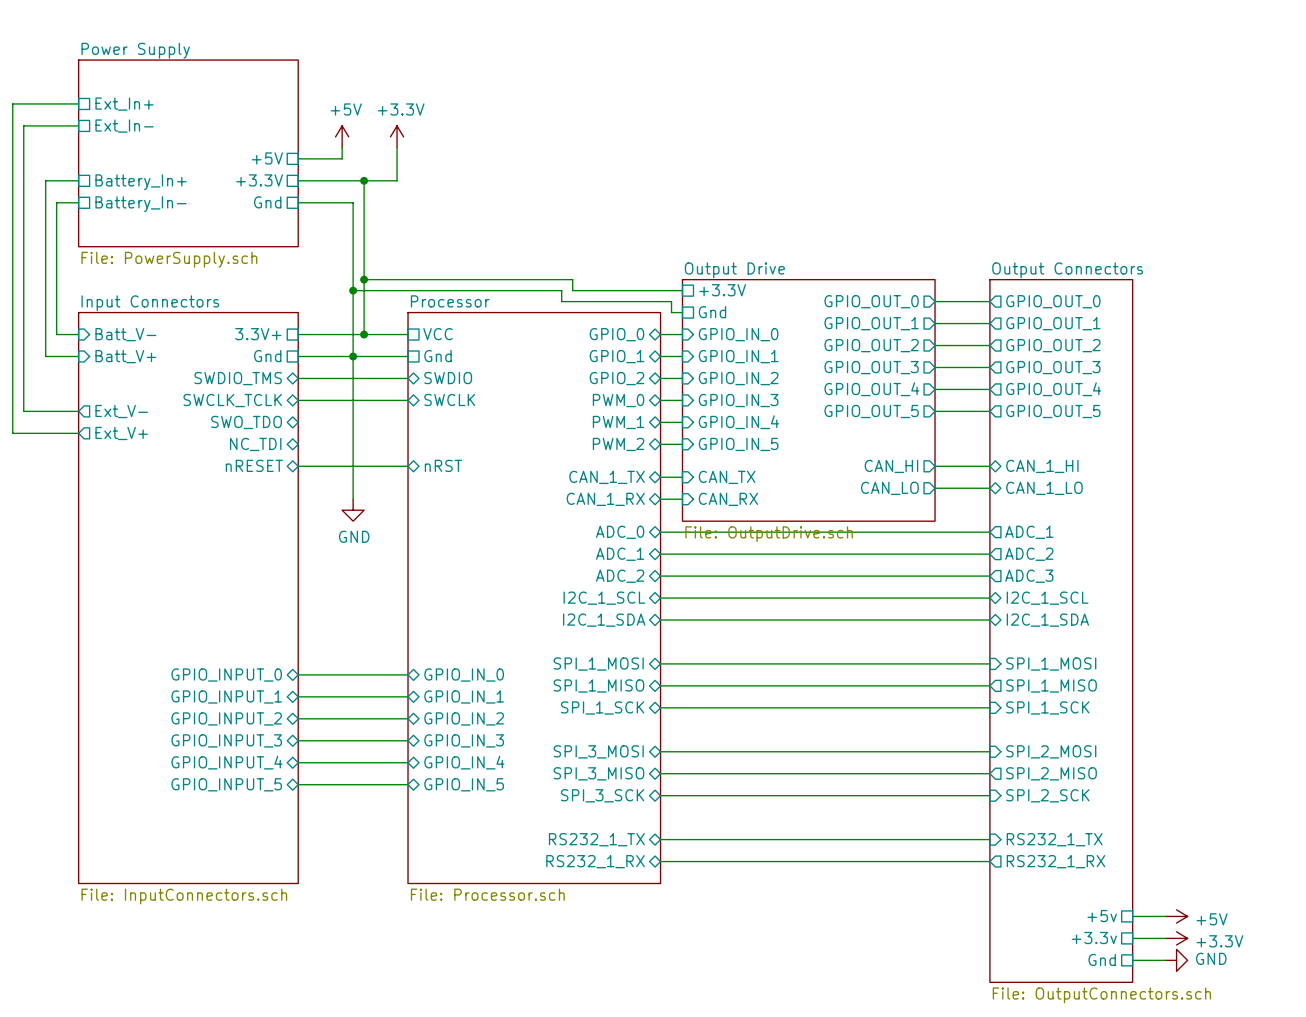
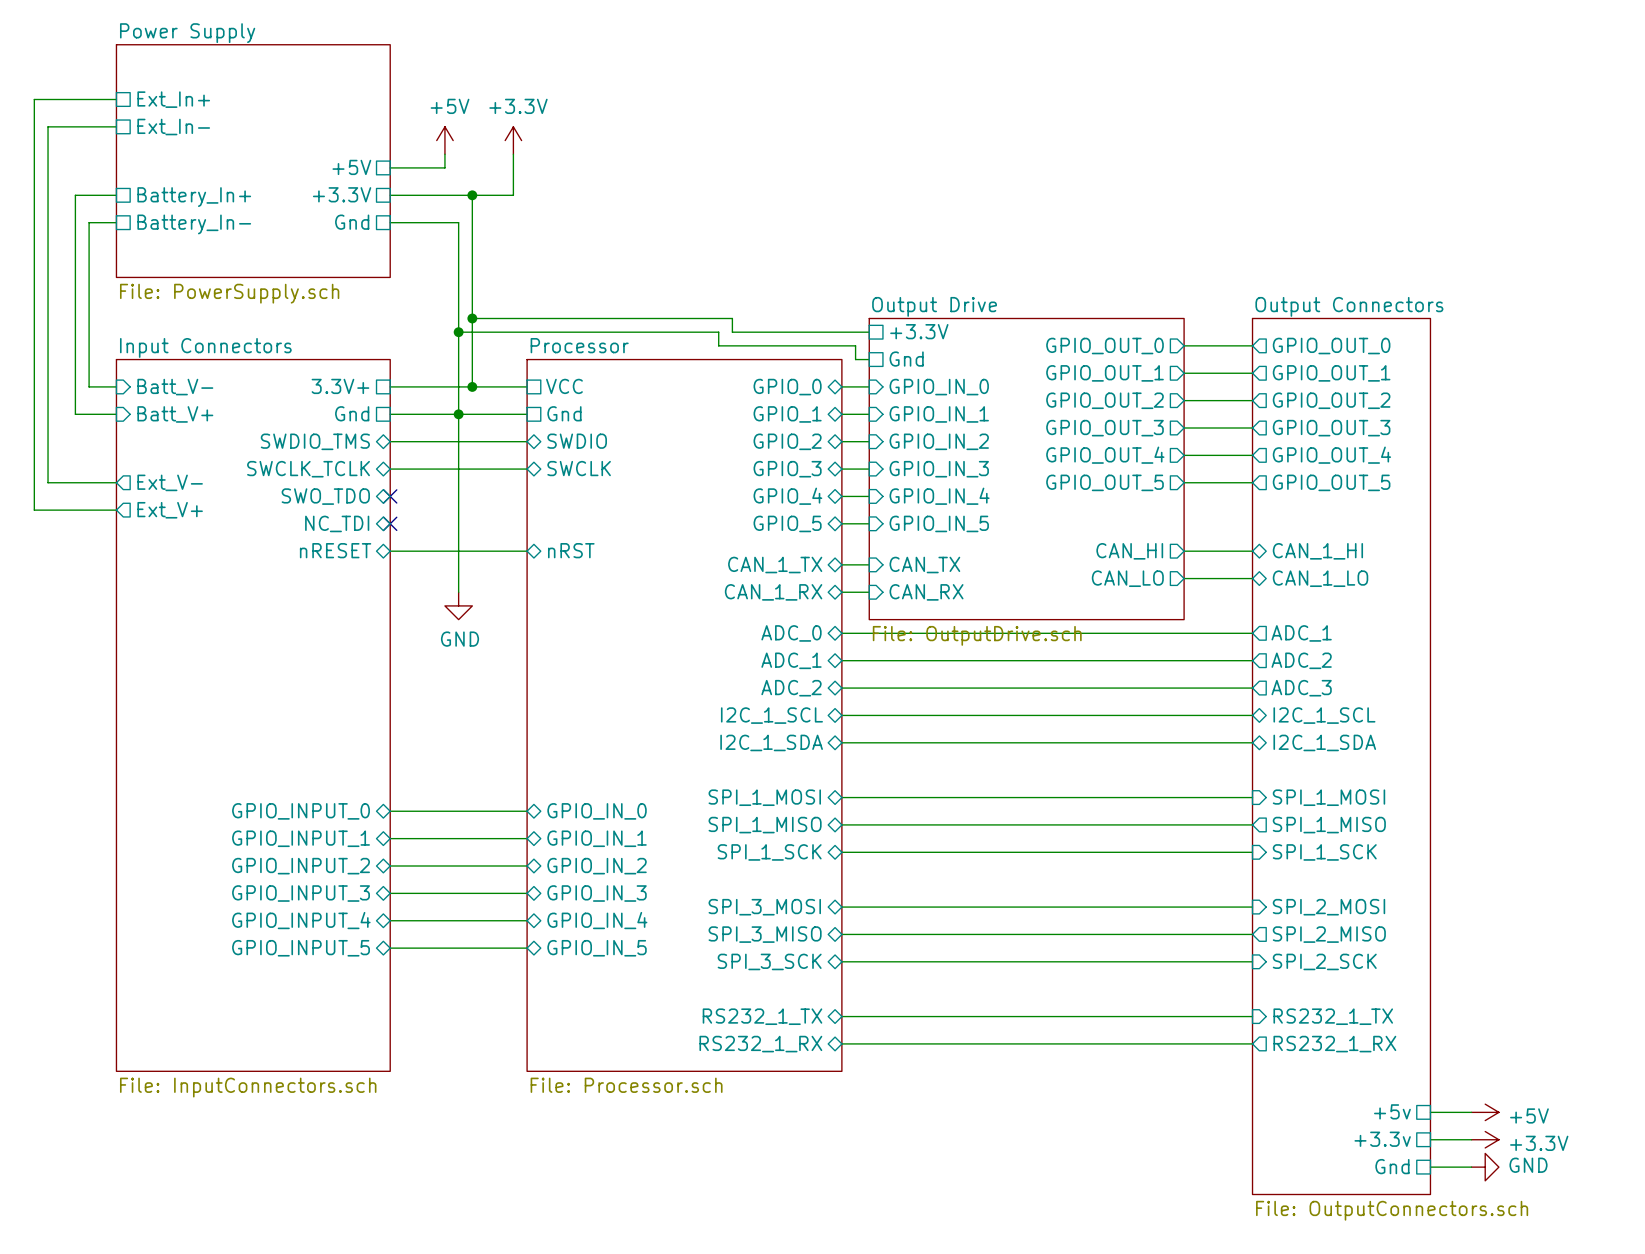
sheet pin: PWM_0 (618, 400) -> GPIO_3 (787, 469)
no-connect mark: none -> (390, 496)
sheet pin: PWM_1 (618, 422) -> GPIO_4 (787, 496)
no-connect mark: none -> (390, 523)
sheet pin: PWM_2 (618, 444) -> GPIO_5 (787, 523)

